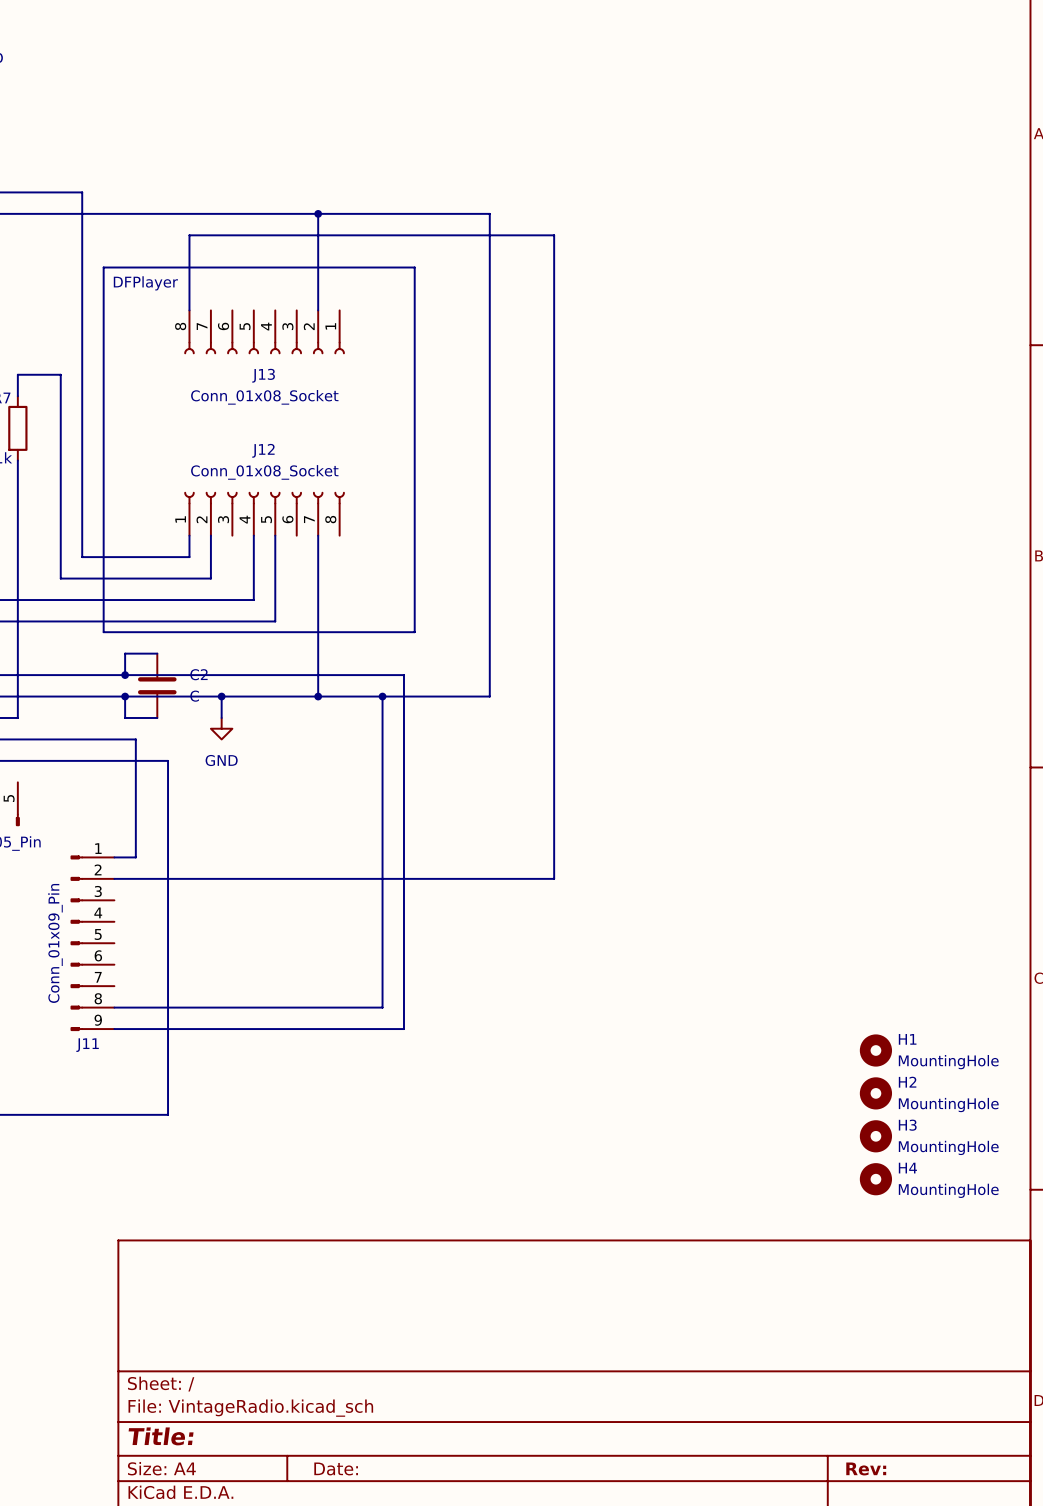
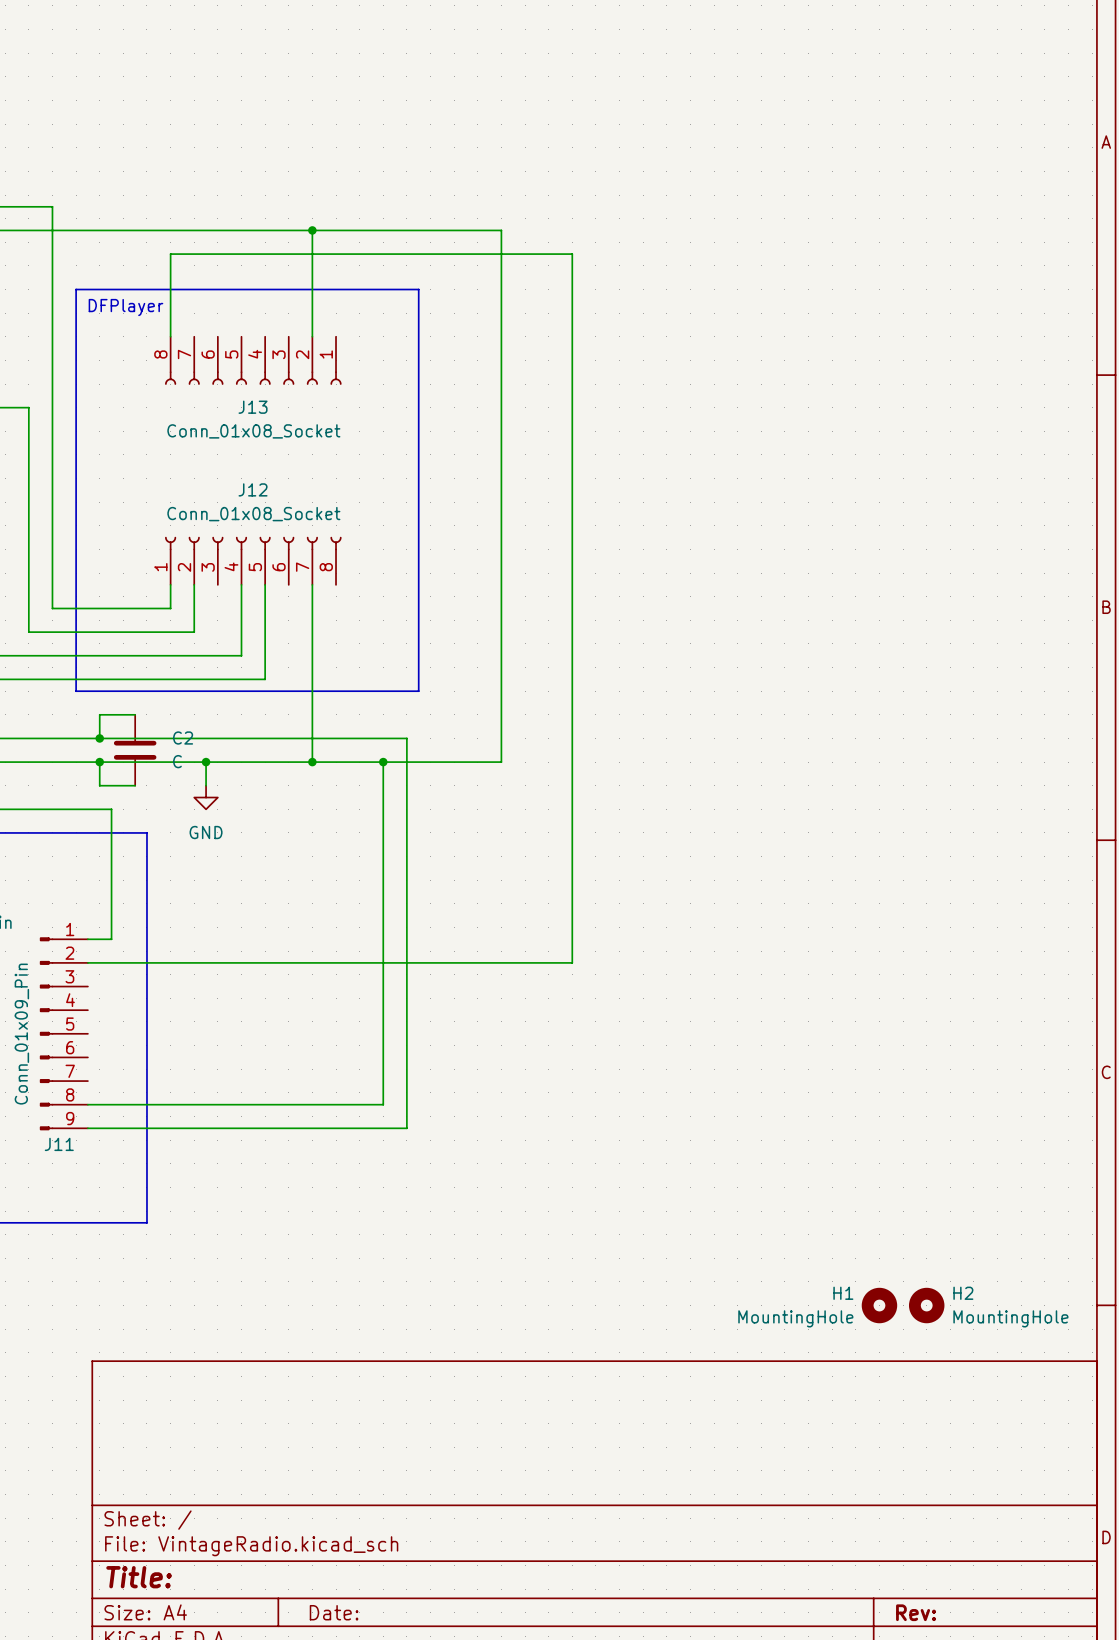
H1 name position: H1 (907, 1039) -> H1 (843, 1293)
H1 position: (875, 1050) -> (879, 1305)
H1 value position: MountingHole (948, 1062) -> MountingHole (795, 1318)
H2 position: (875, 1093) -> (926, 1305)
H3: MountingHole (875, 1136) -> none
H4: MountingHole (875, 1179) -> none

